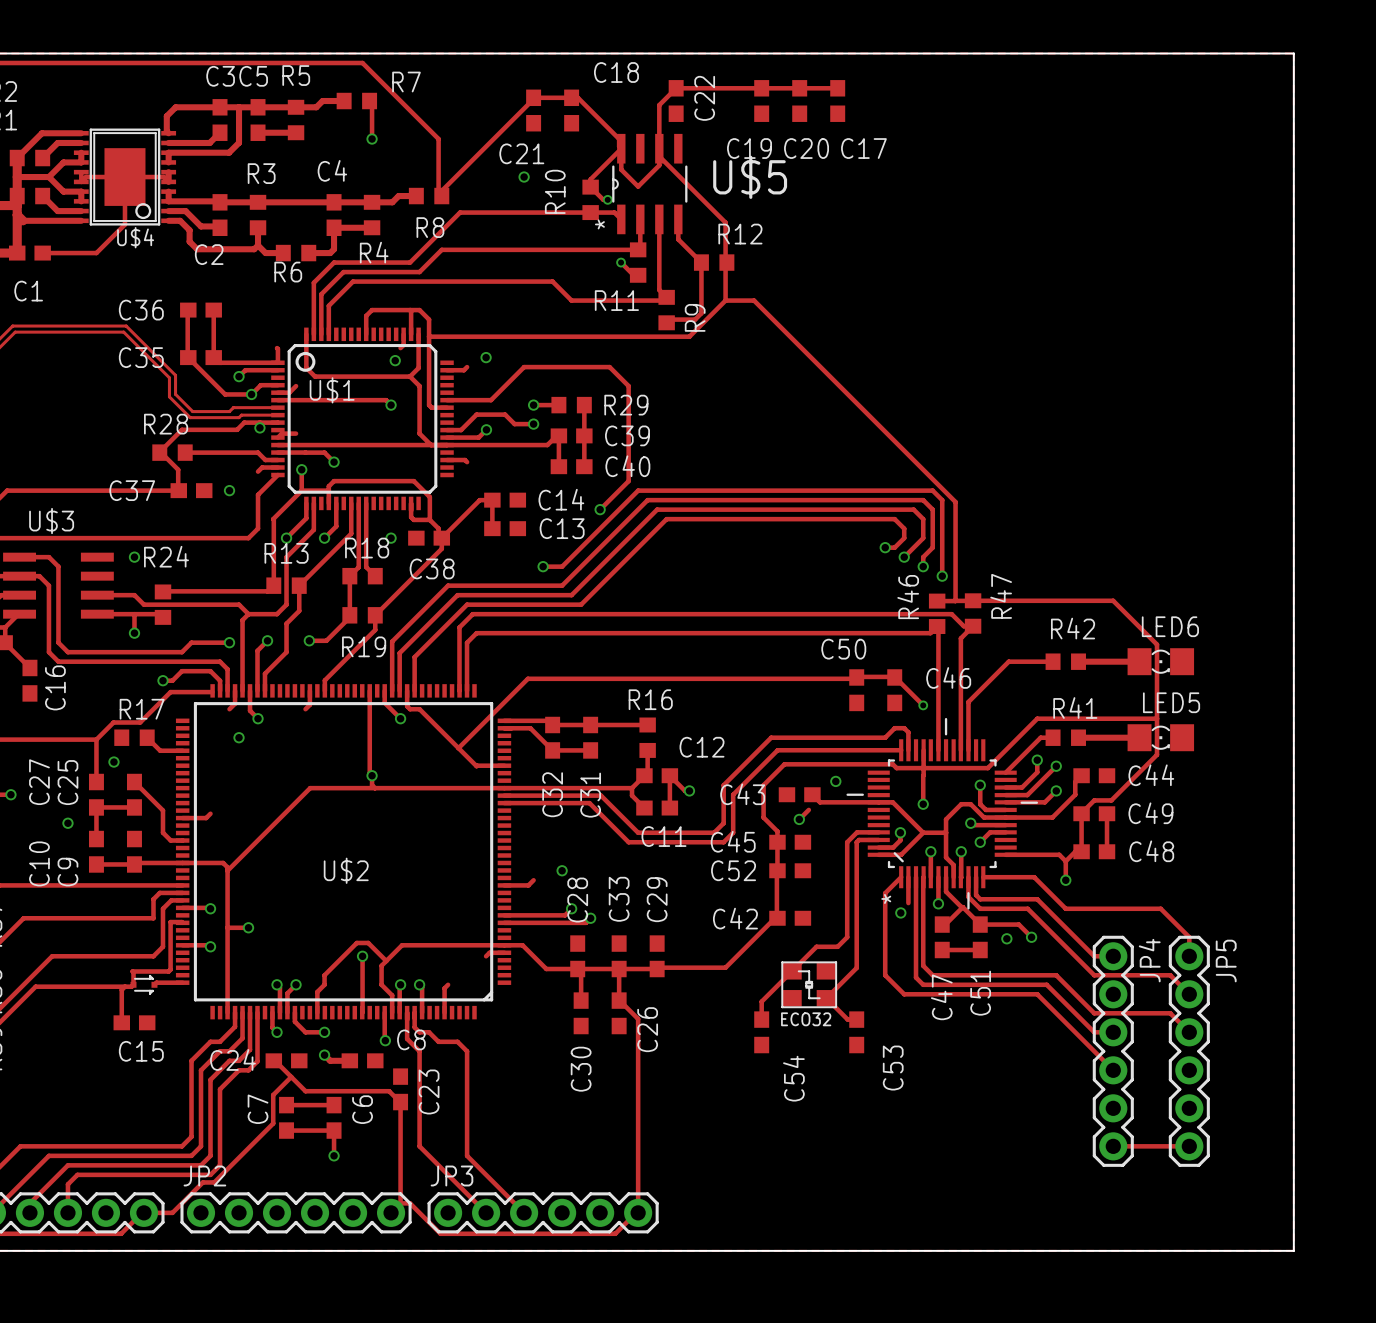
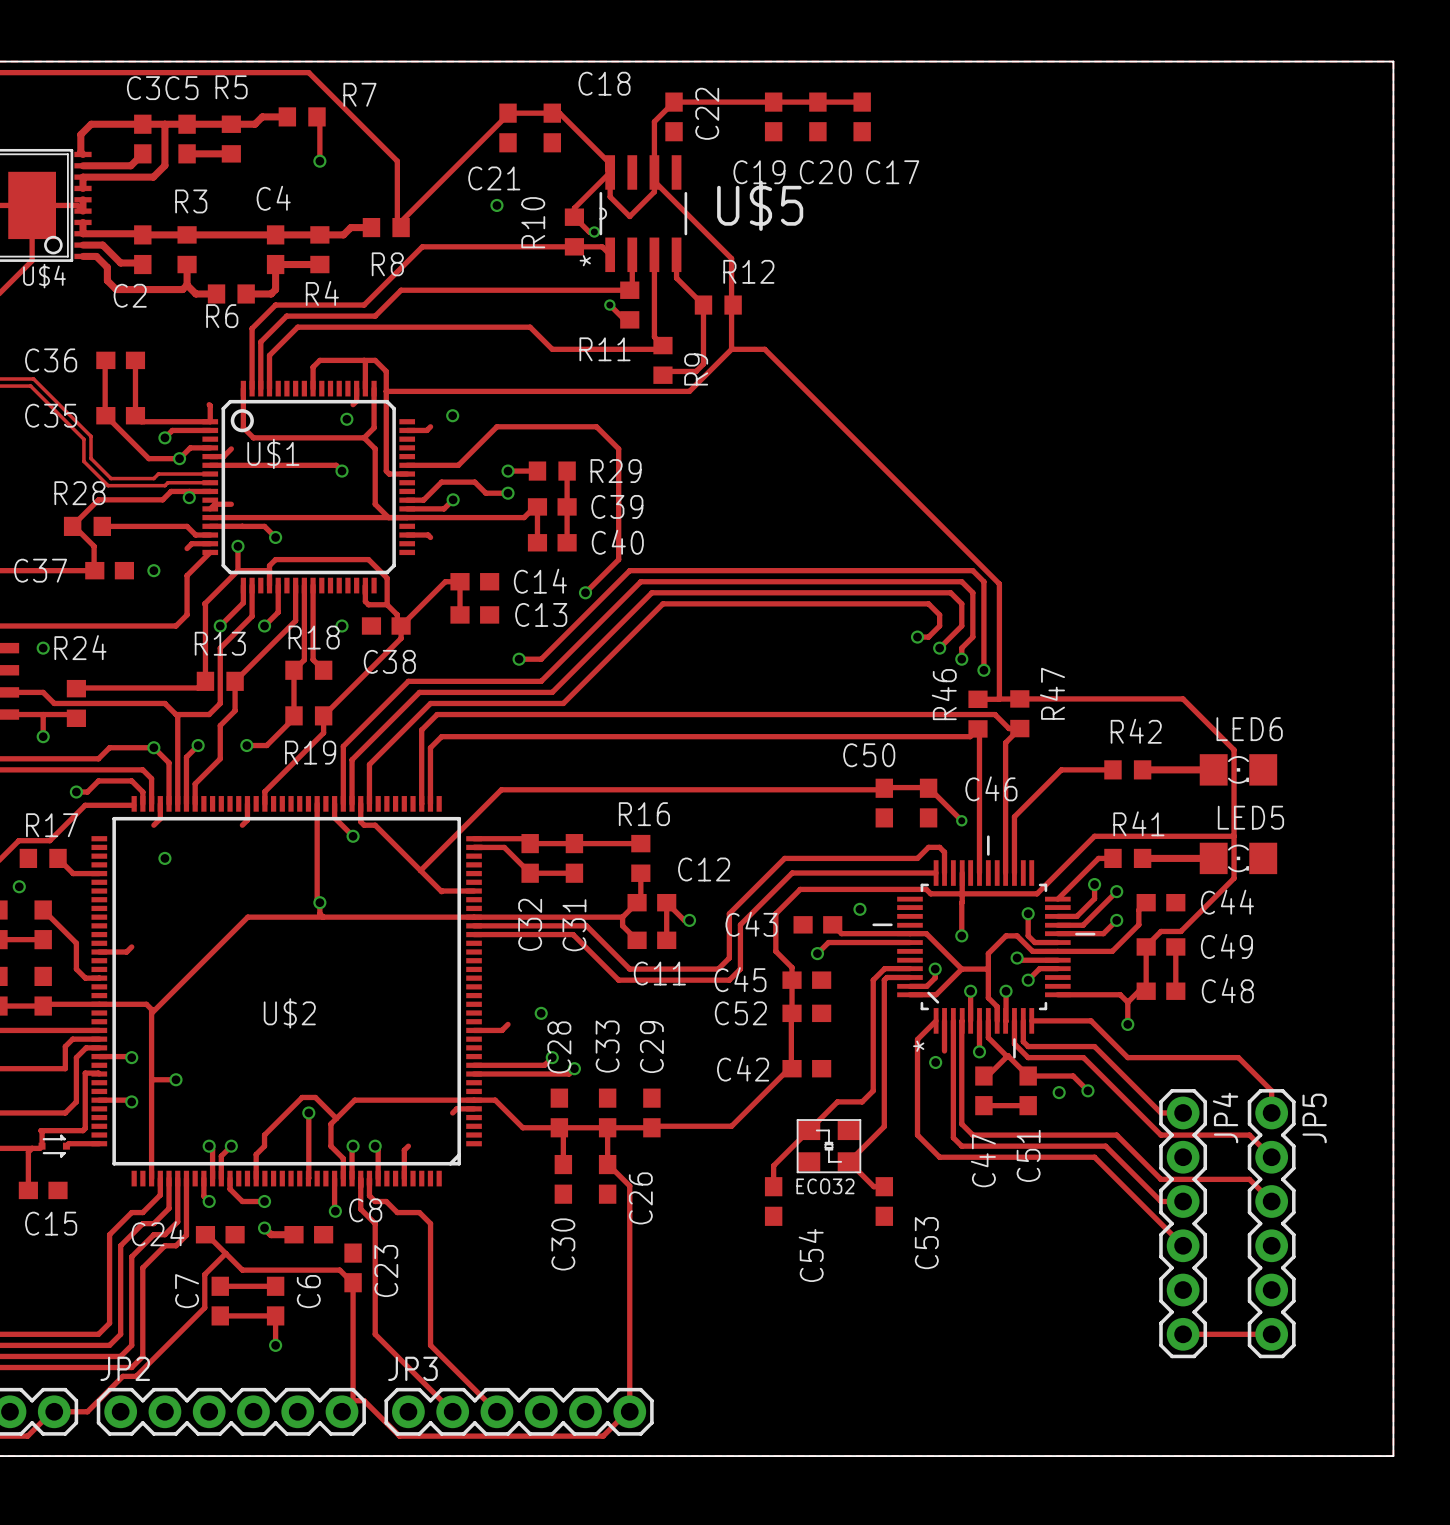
track: (248, 614) (242, 620) (242, 655) -> (153, 747) (169, 762)
track: (250, 690) (250, 710) (258, 718) -> (177, 803) (177, 716) (176, 714)
via: (258, 718) -> none
track: none -> (828, 942) (909, 942)

